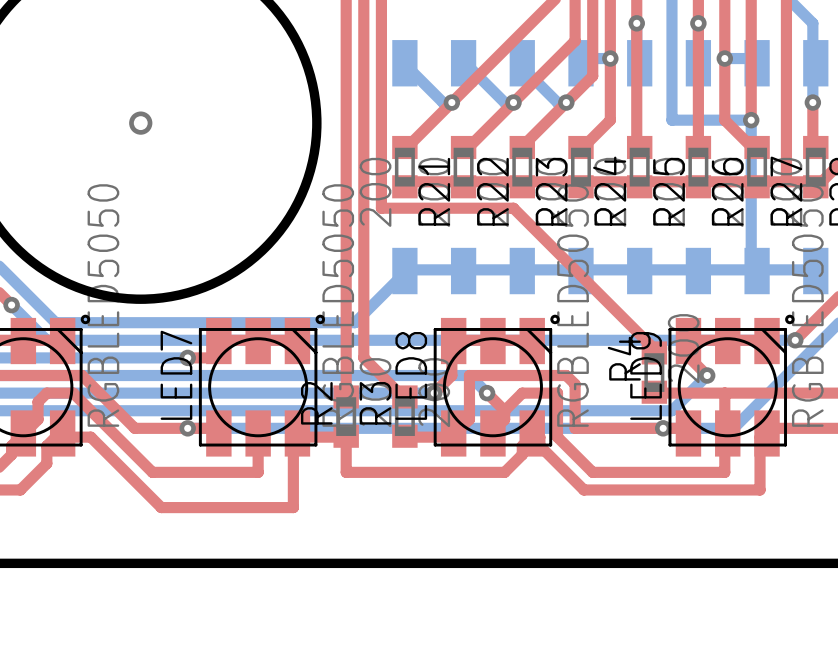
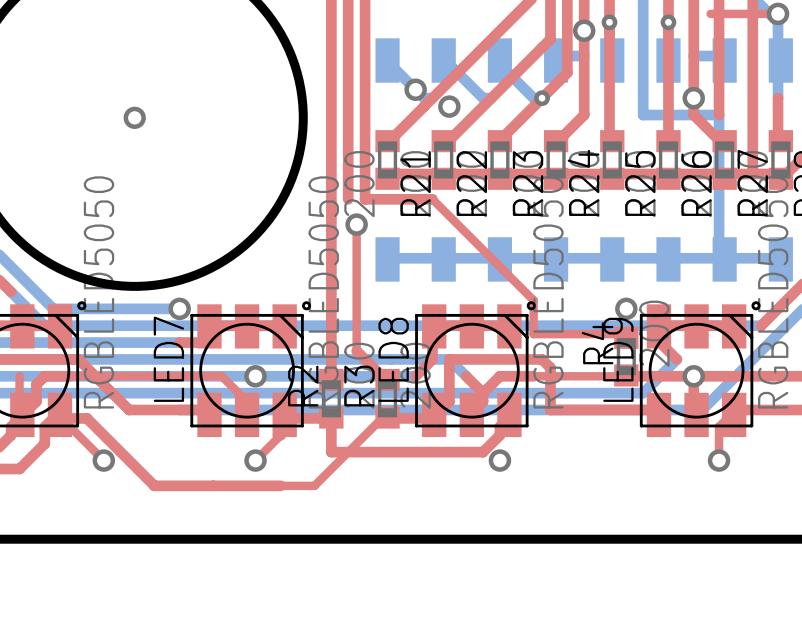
top track: none -> (710, 13) (778, 13)
via: none -> (778, 13)
via: none -> (584, 30)
via: (610, 58) -> none
via: (724, 58) -> none
via: none -> (415, 89)
via: (451, 102) -> none
via: (513, 102) -> none
via: none -> (693, 98)
via: (812, 102) -> none
via: none -> (449, 106)
via: (751, 120) -> none
top track: (363, 208) (363, 357) (372, 366) -> (356, 224) (356, 351)
top track: (451, 208) (513, 208) (654, 349) -> (432, 199) (533, 300) (533, 334) (626, 334)
via: none -> (356, 224)
bottom track: (404, 271) (355, 322) (187, 322) -> none
via: (11, 305) -> none
via: none -> (179, 308)
via: none -> (626, 308)
via: (795, 340) -> none
via: (187, 357) -> none
via: (707, 375) -> none
top track: none -> (19, 376) (19, 409) (22, 414)
top track: (73, 393) (152, 472) (258, 472) (258, 433) -> (70, 376) (221, 376) (238, 393)
via: none -> (255, 376)
via: (434, 393) -> none
via: (487, 393) -> none
top track: (557, 393) (557, 437) (592, 472) (724, 472) (724, 437) (727, 433) -> (533, 376) (626, 375)
via: none -> (693, 376)
via: (187, 428) -> none
via: (663, 428) -> none
top track: (532, 433) (539, 437) (539, 445) (583, 489) (760, 489) (760, 437) -> (719, 460) (719, 426) (727, 418)
top track: none -> (387, 417) (381, 418) (314, 485) (280, 485)
top track: none -> (61, 418) (103, 460)
top track: (293, 454) (293, 507) -> (280, 435) (255, 460)
via: none -> (103, 460)
via: none -> (255, 460)
via: none -> (499, 460)
via: none -> (719, 460)

